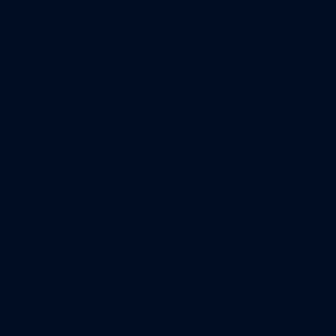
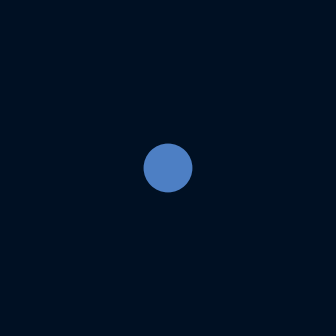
part: none -> (167, 167)

